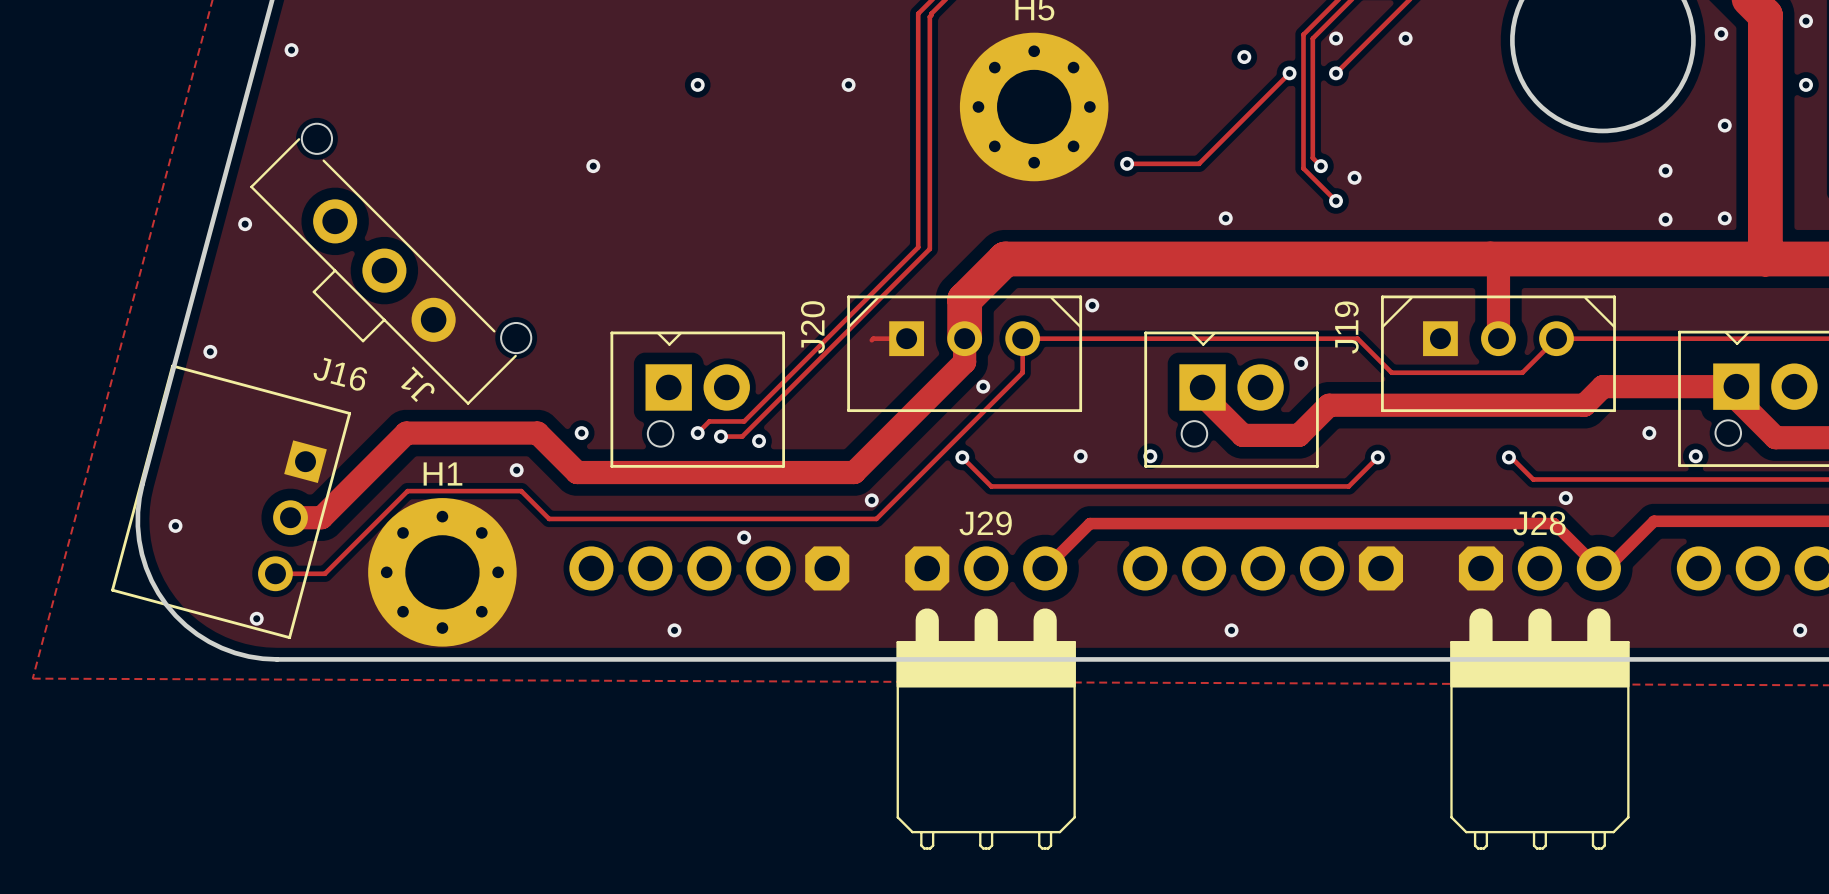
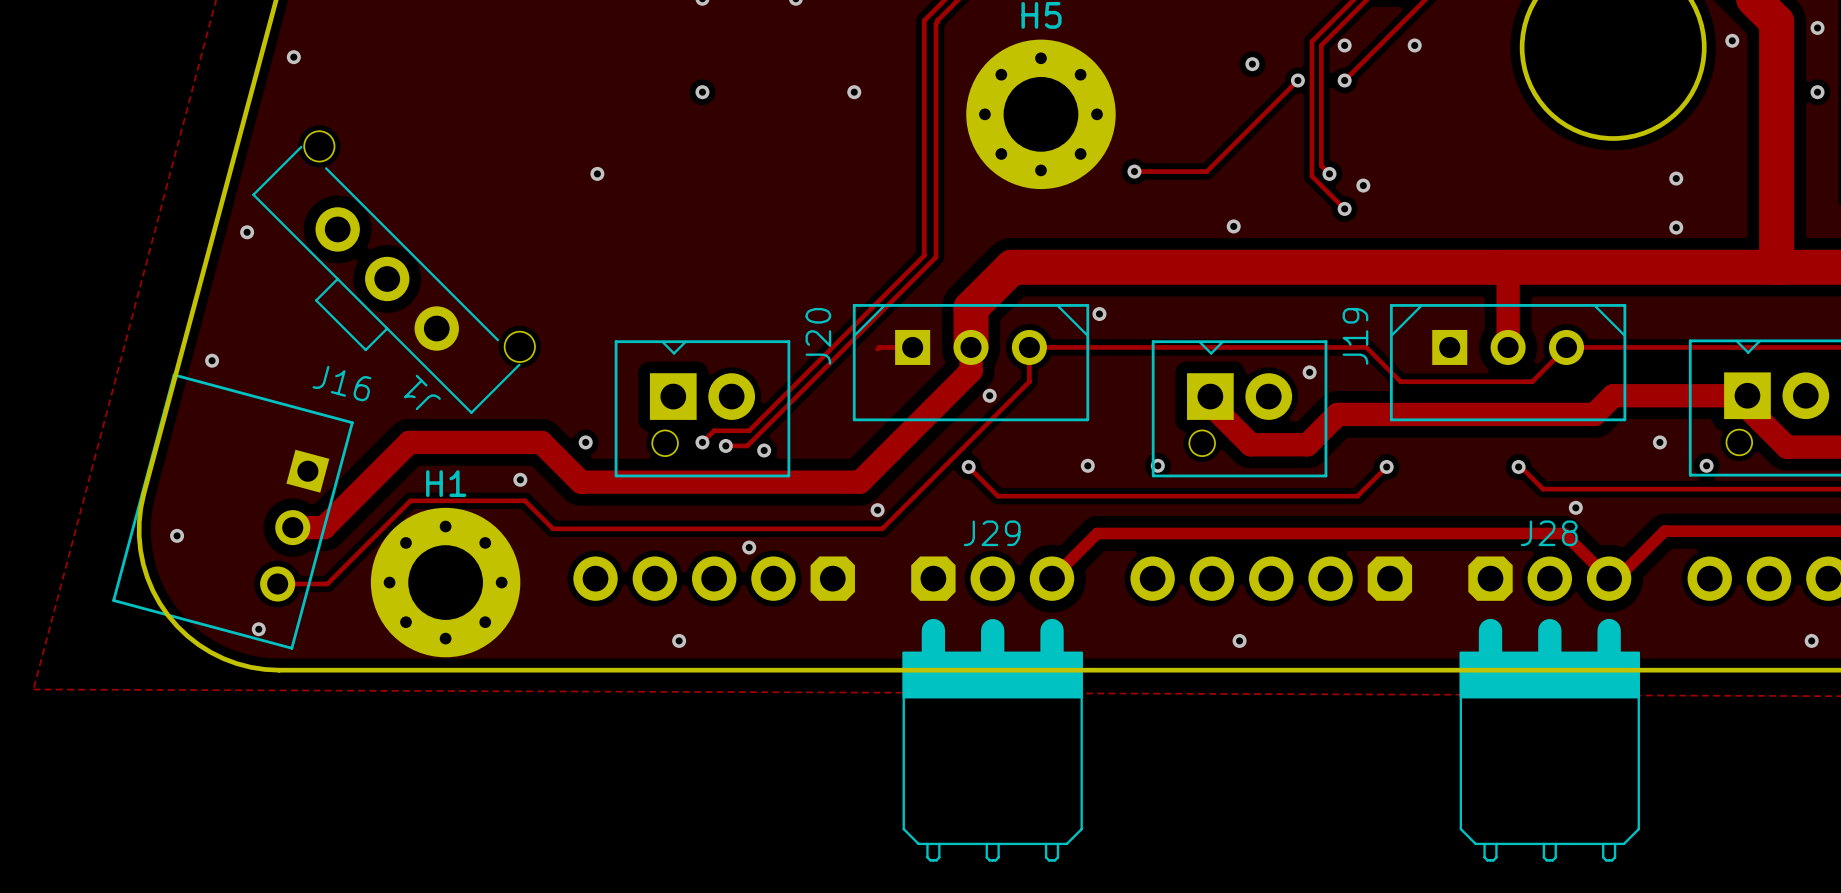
via: (1724, 125) -> none
via: (1724, 218) -> none

